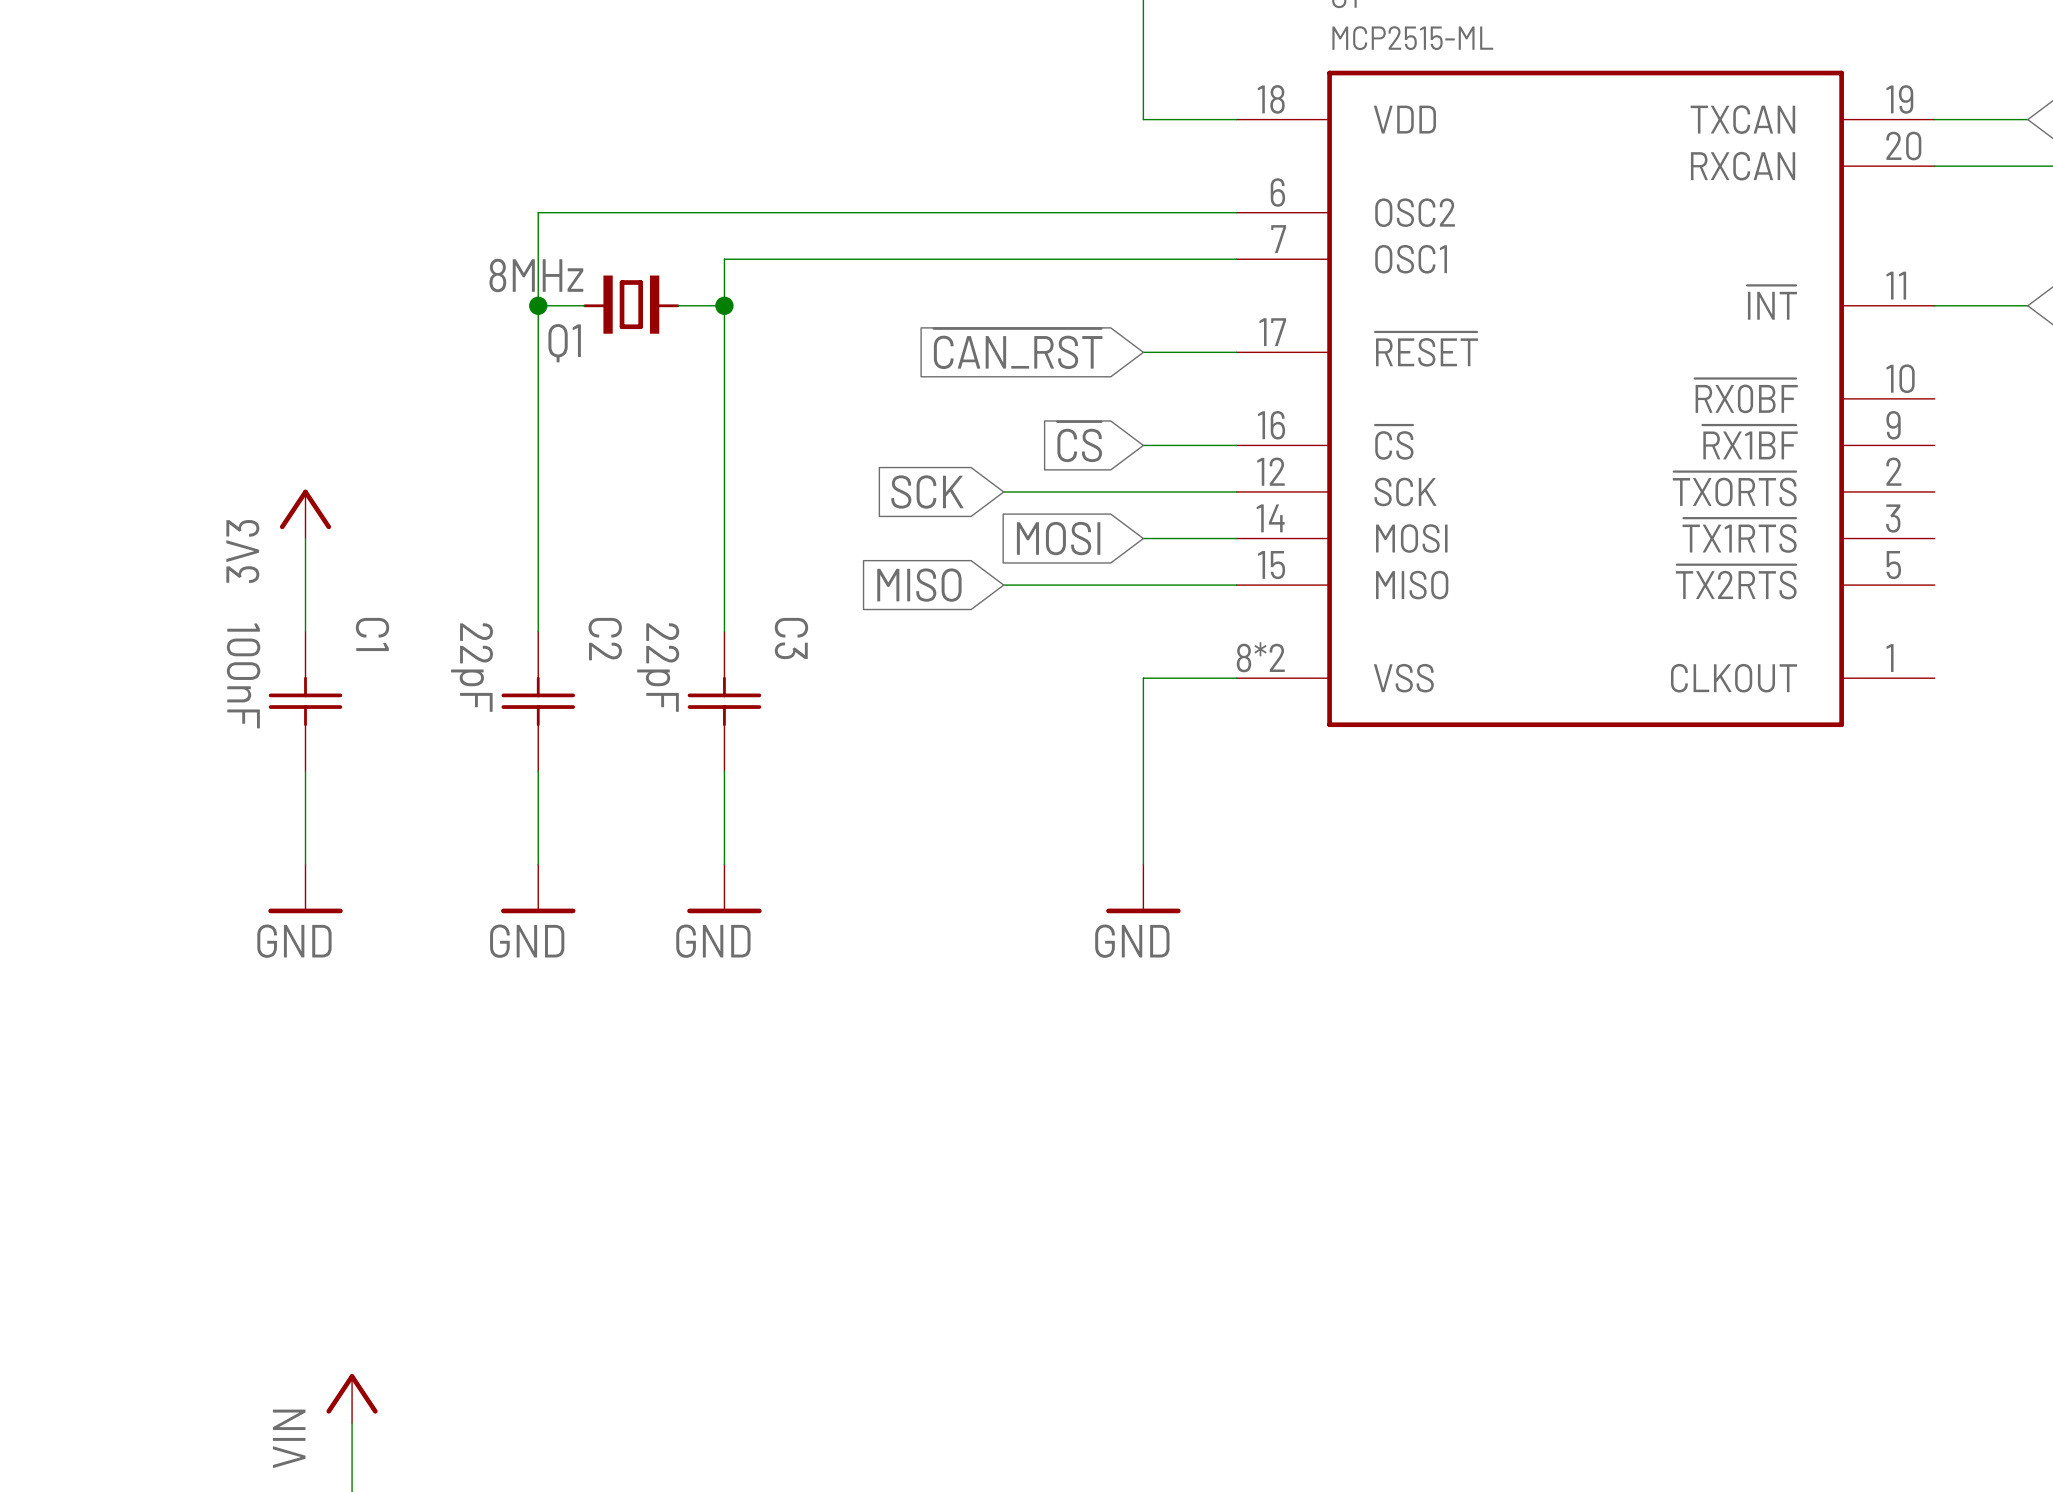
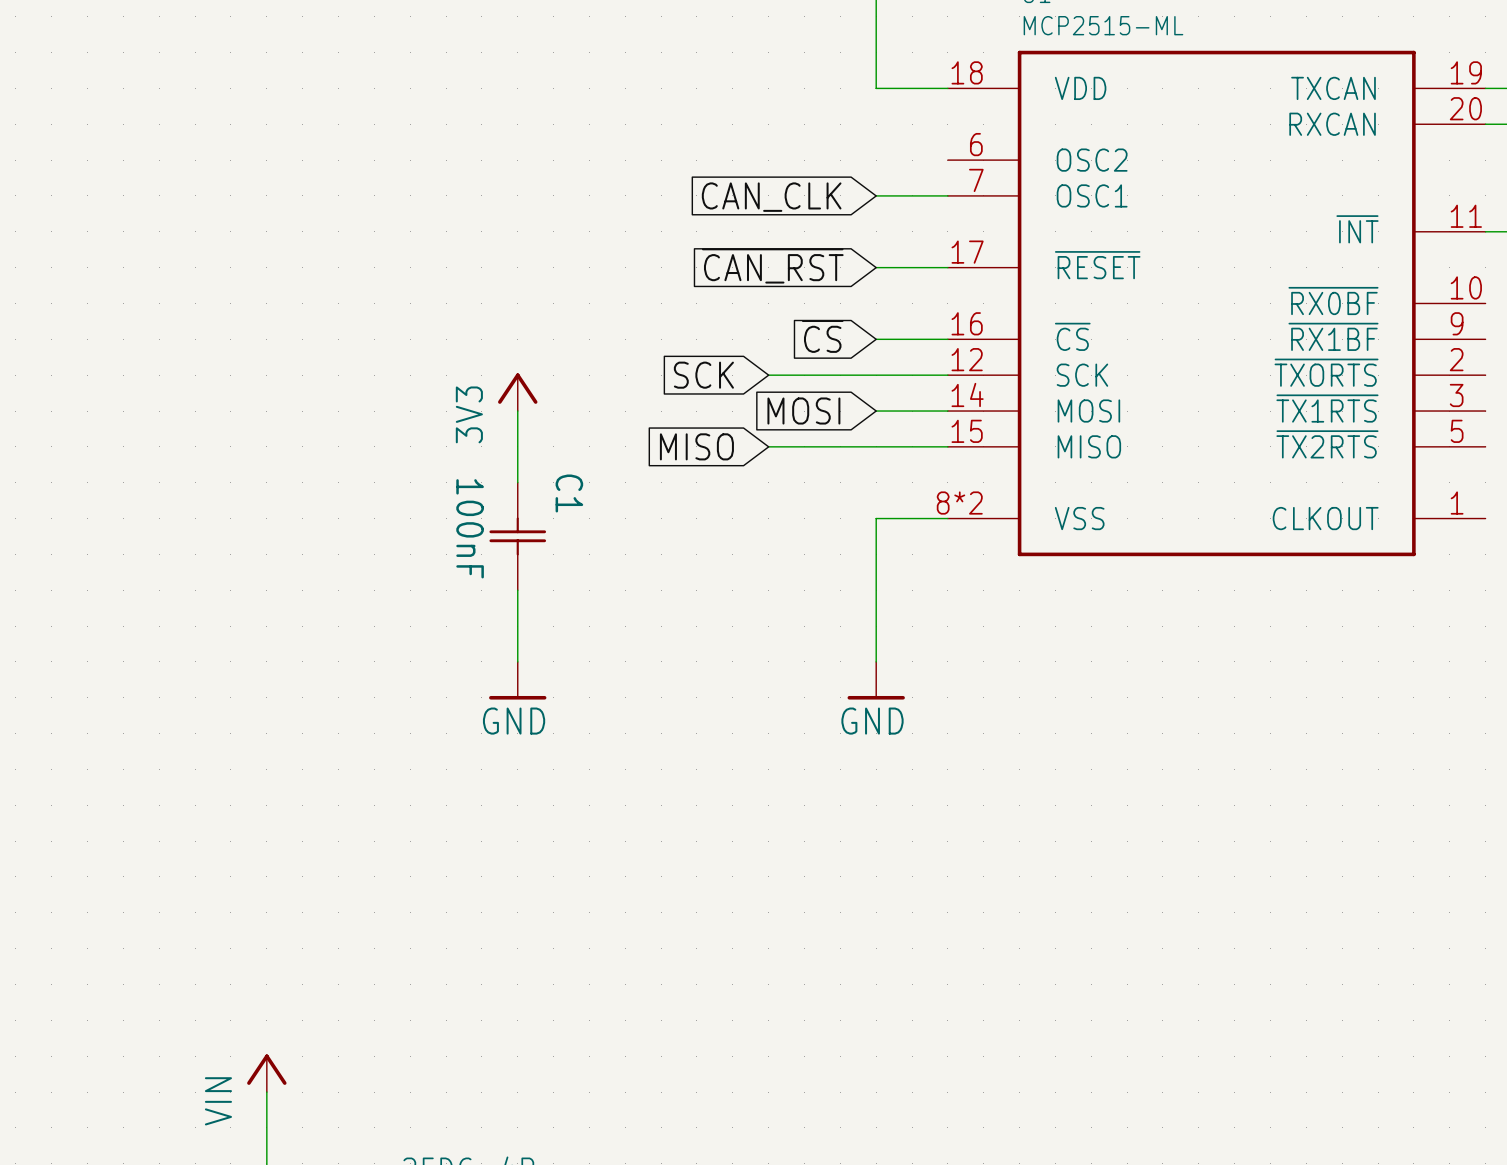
wire: (1236, 212) (538, 212) (538, 631) -> none
global label: none -> CAN_CLK (771, 197)
wire: (1143, 259) (724, 259) (724, 631) -> none
Q1: 8MHz (631, 304) -> none
wire: (538, 305) (584, 305) -> none
junction: (538, 305) -> none
wire: (677, 305) (724, 305) -> none
junction: (724, 305) -> none
power symbol position: 3V3 (305, 514) -> 3V3 (517, 392)
wire: (305, 538) (305, 631) -> (517, 411) (517, 482)
C1 position: (305, 701) -> (517, 536)
C2: 22pF (538, 701) -> none
C3: 22pF (724, 701) -> none
wire: (305, 771) (305, 864) -> (517, 590) (517, 661)
wire: (538, 771) (538, 864) -> none
wire: (724, 771) (724, 864) -> none
power symbol: GND (305, 888) -> none
power symbol: GND (538, 888) -> none
power symbol position: GND (724, 888) -> GND (517, 680)

